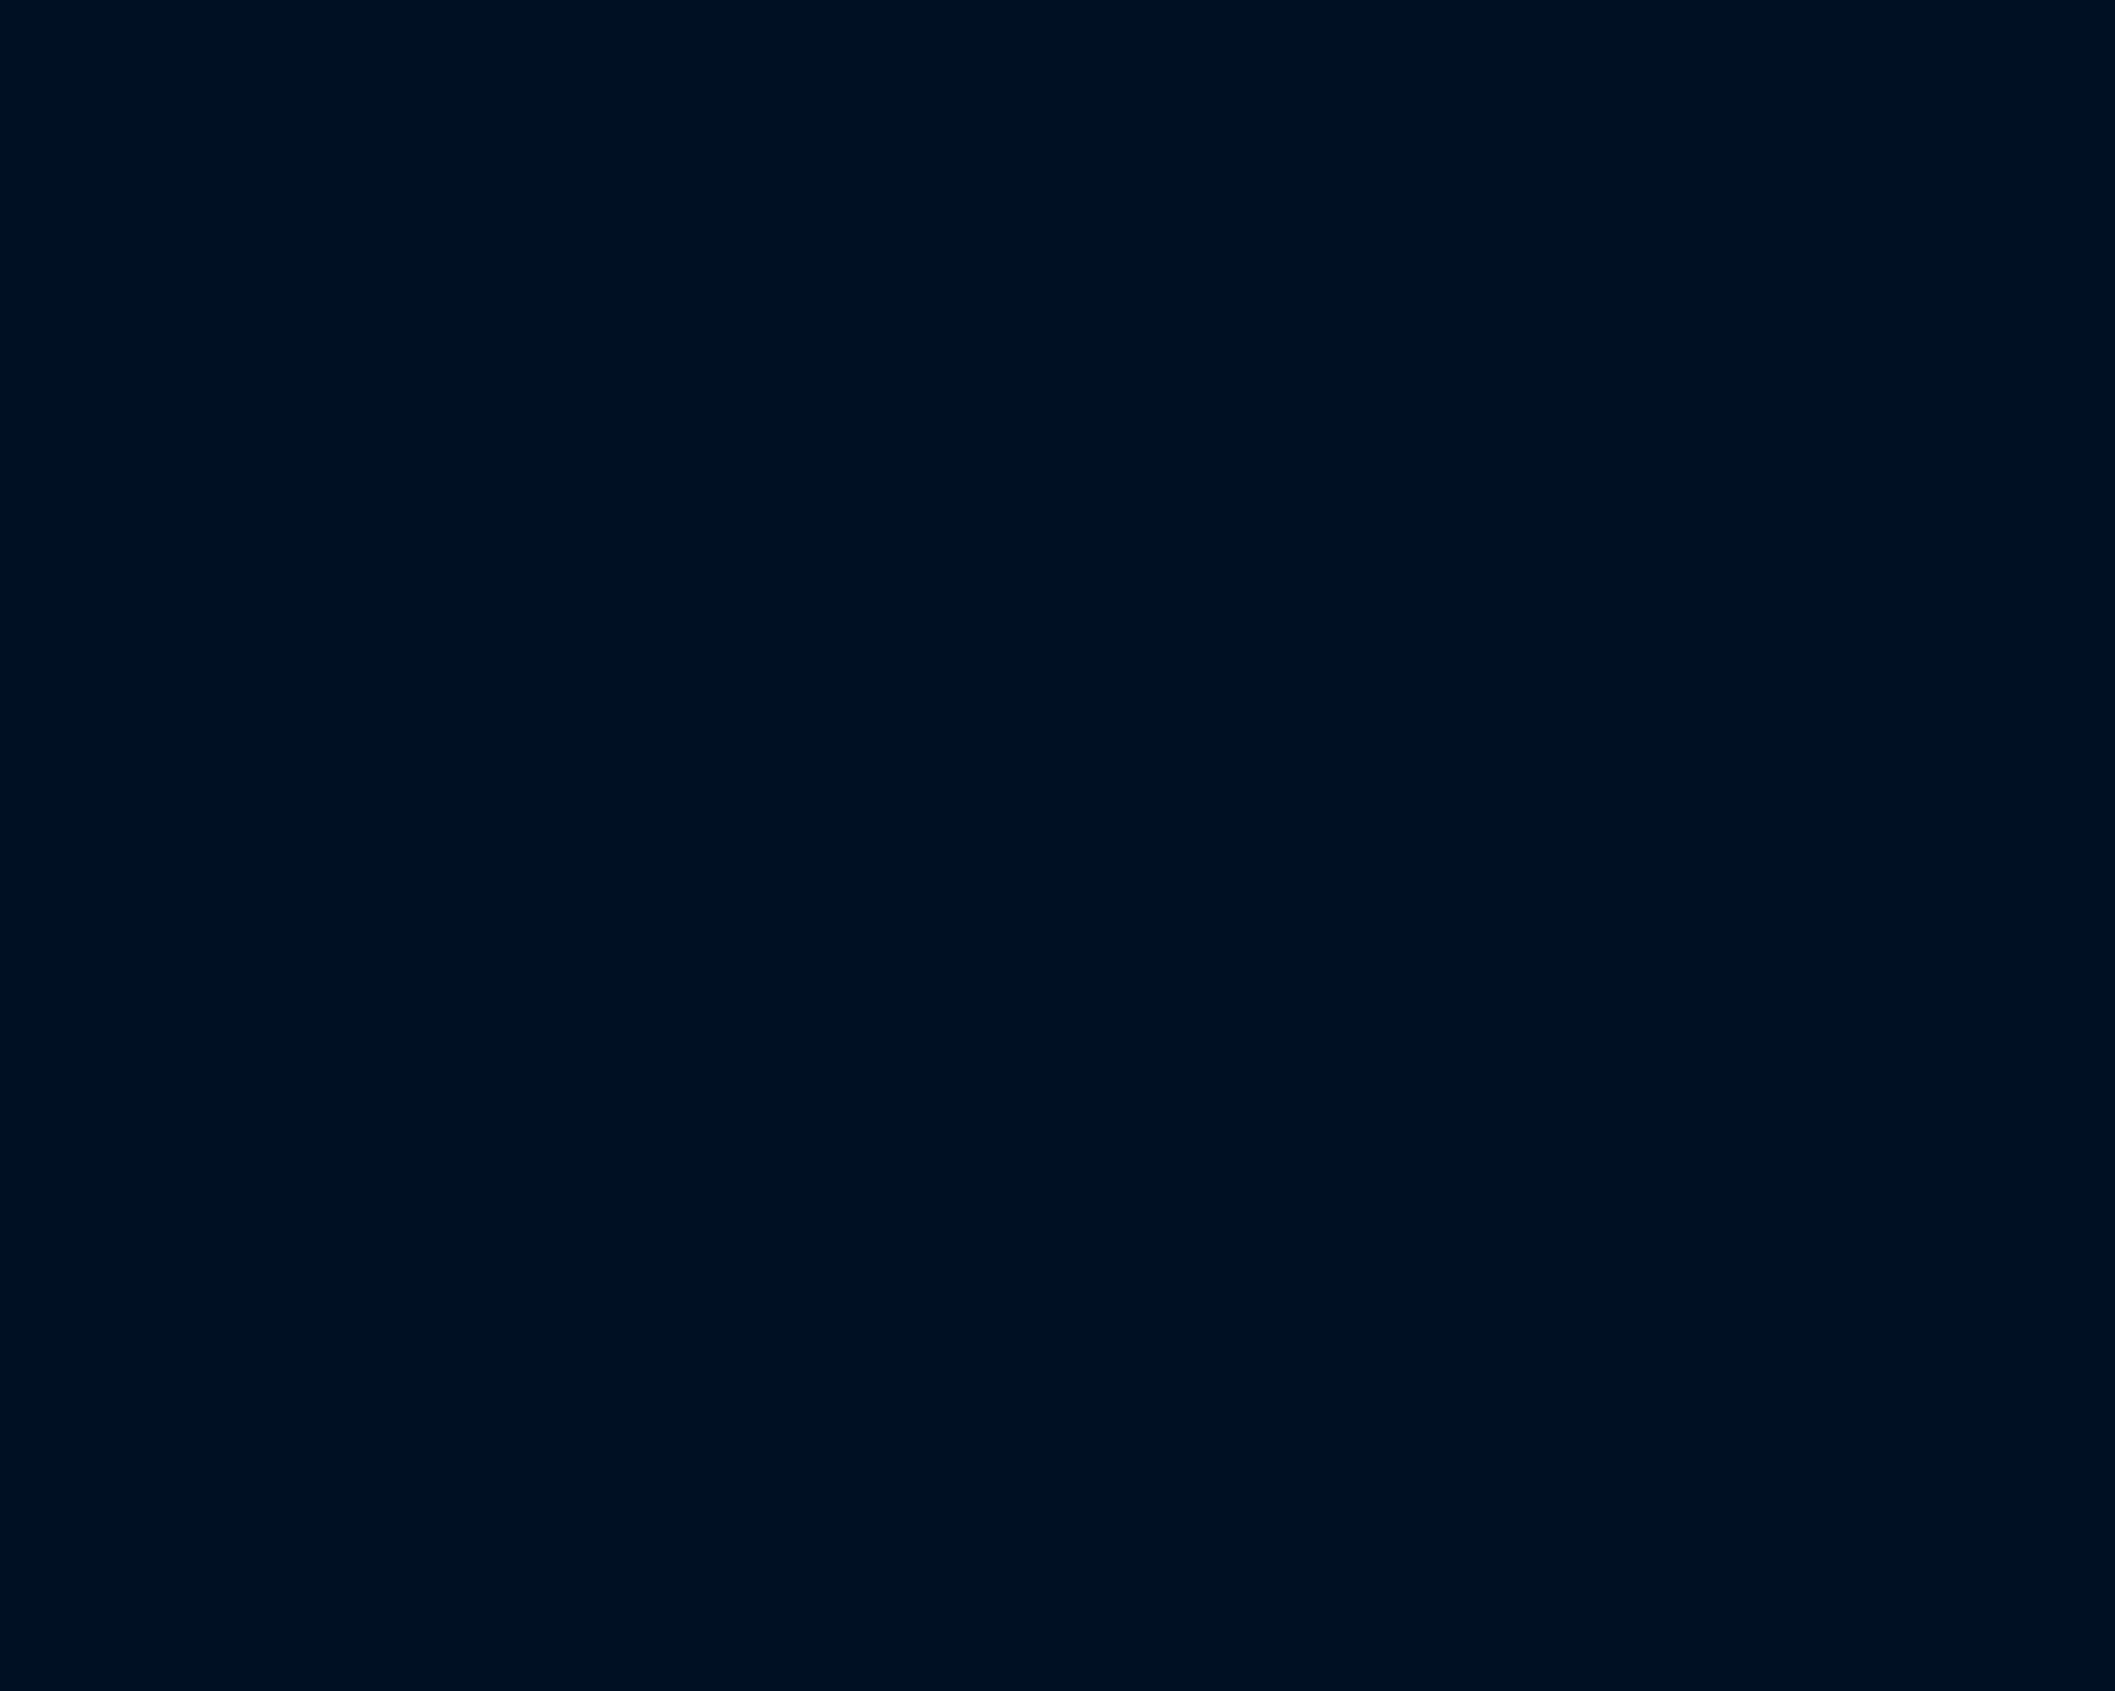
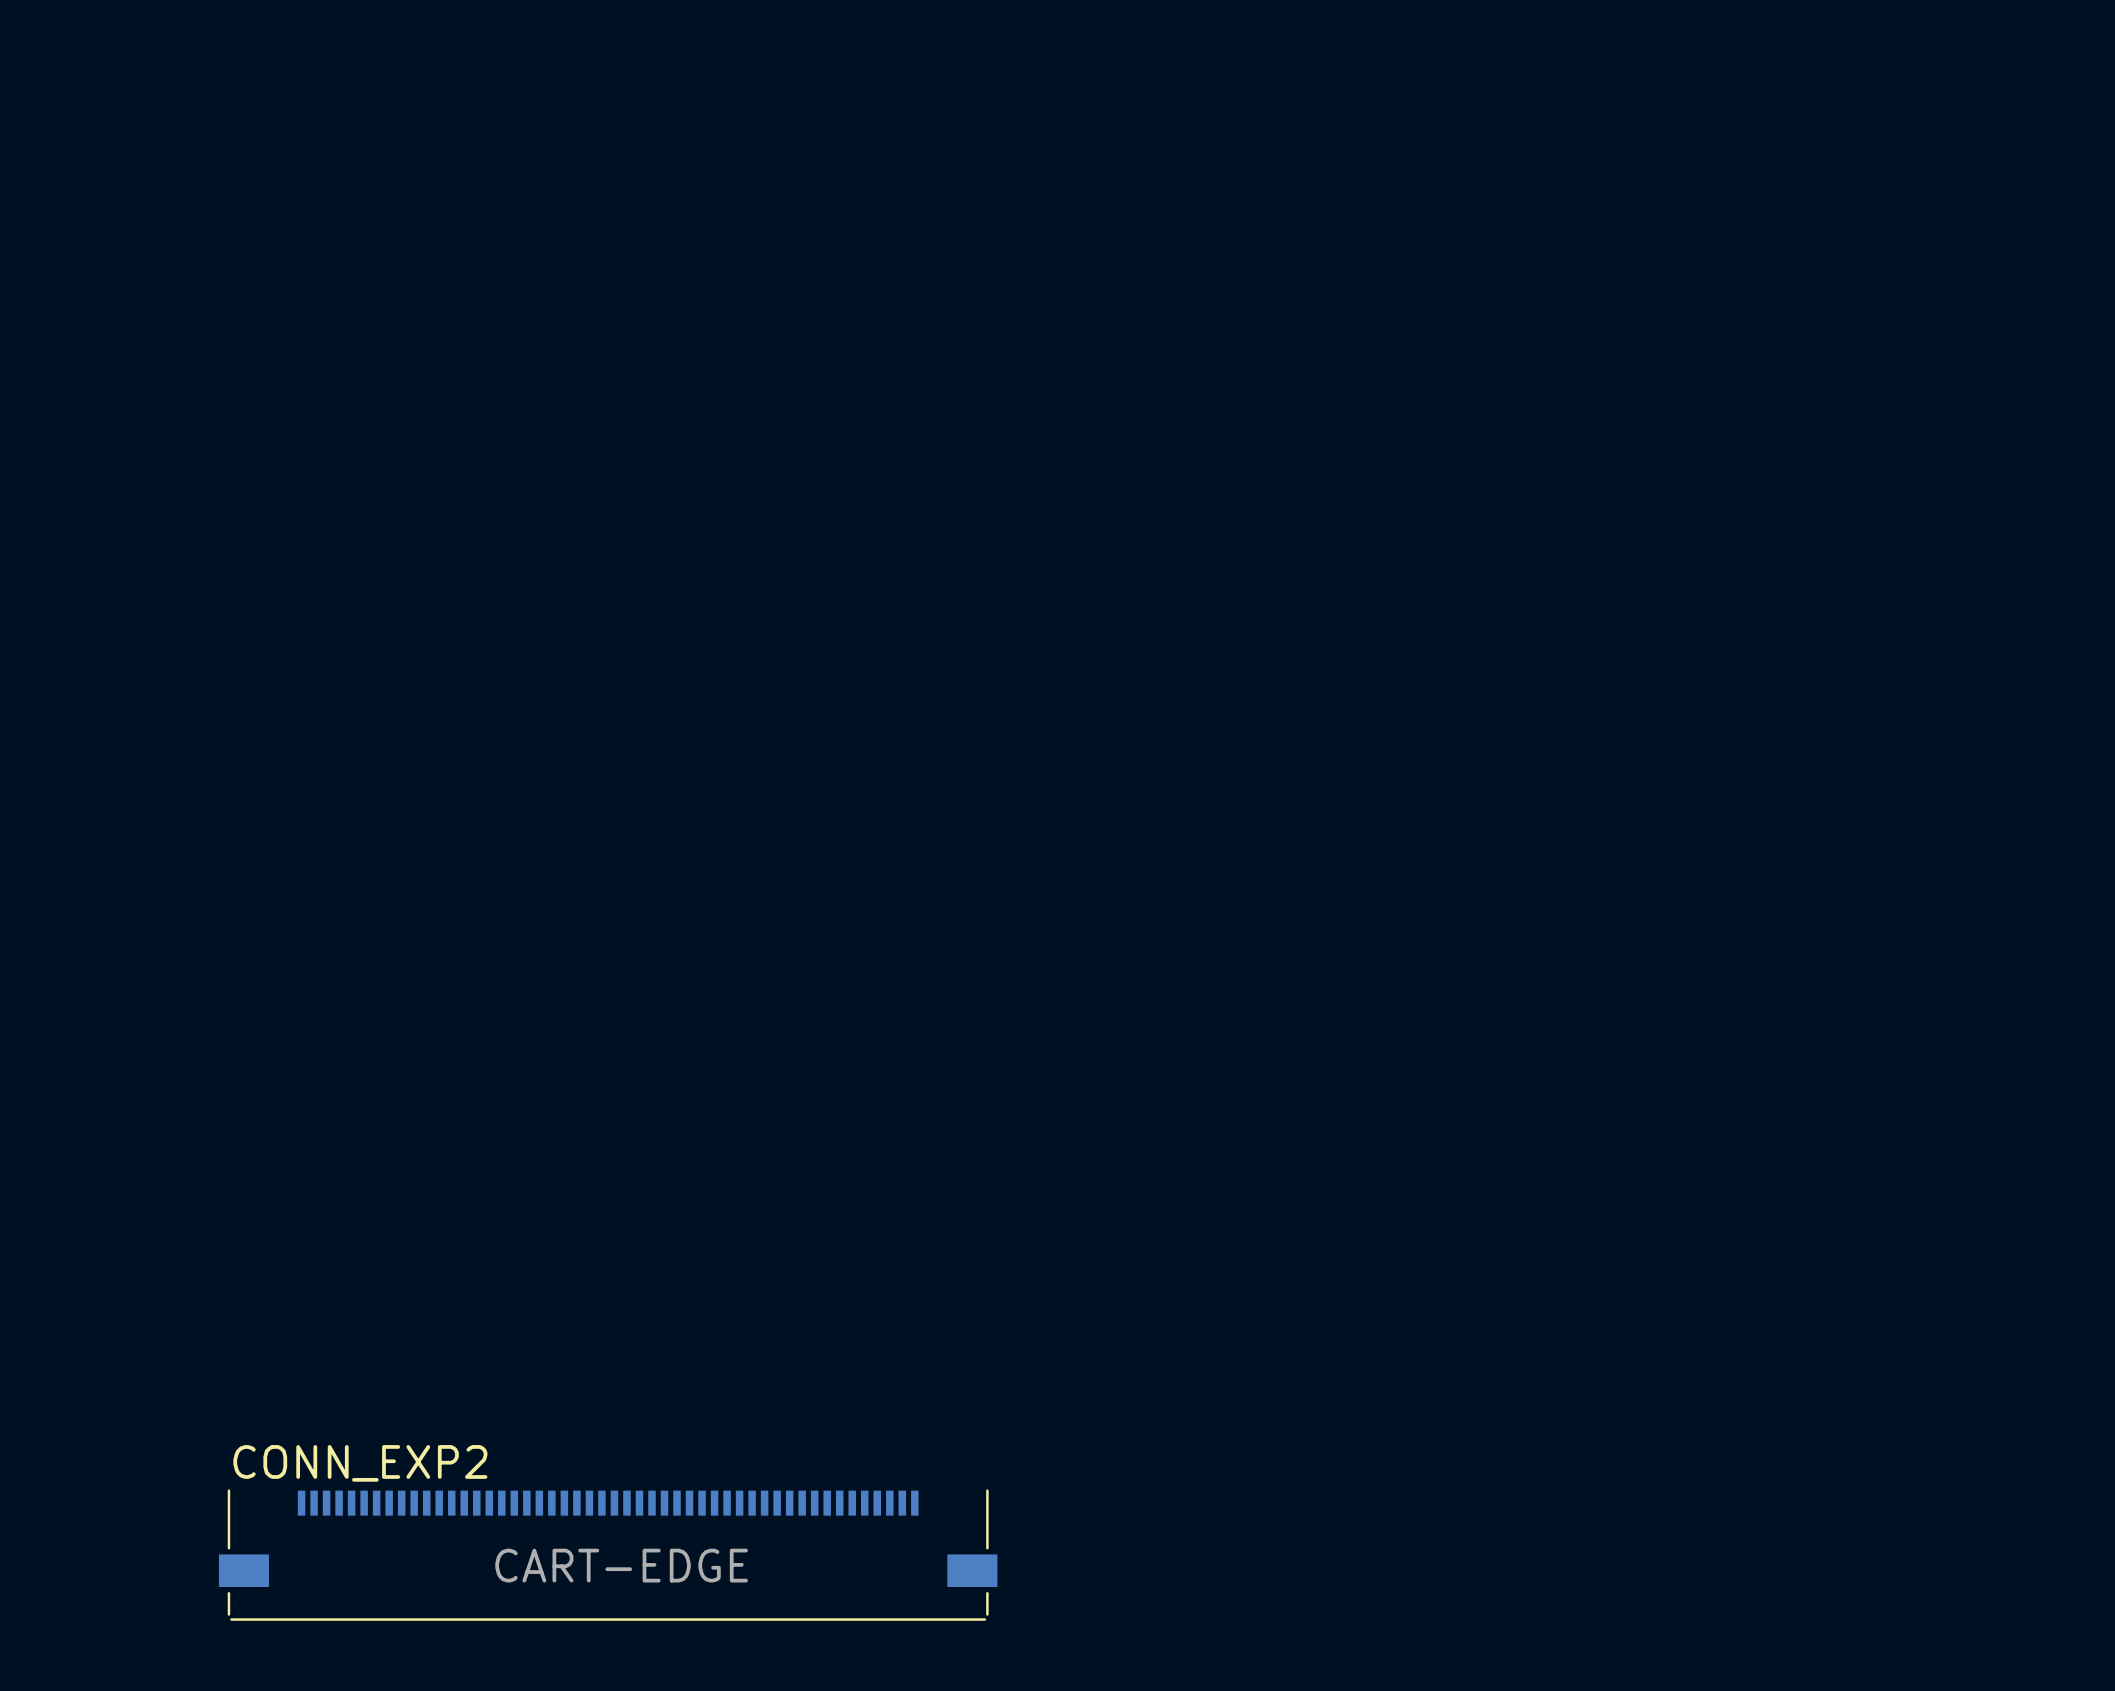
CONN_EXP2: none -> CART-EDGE (608, 1555)

